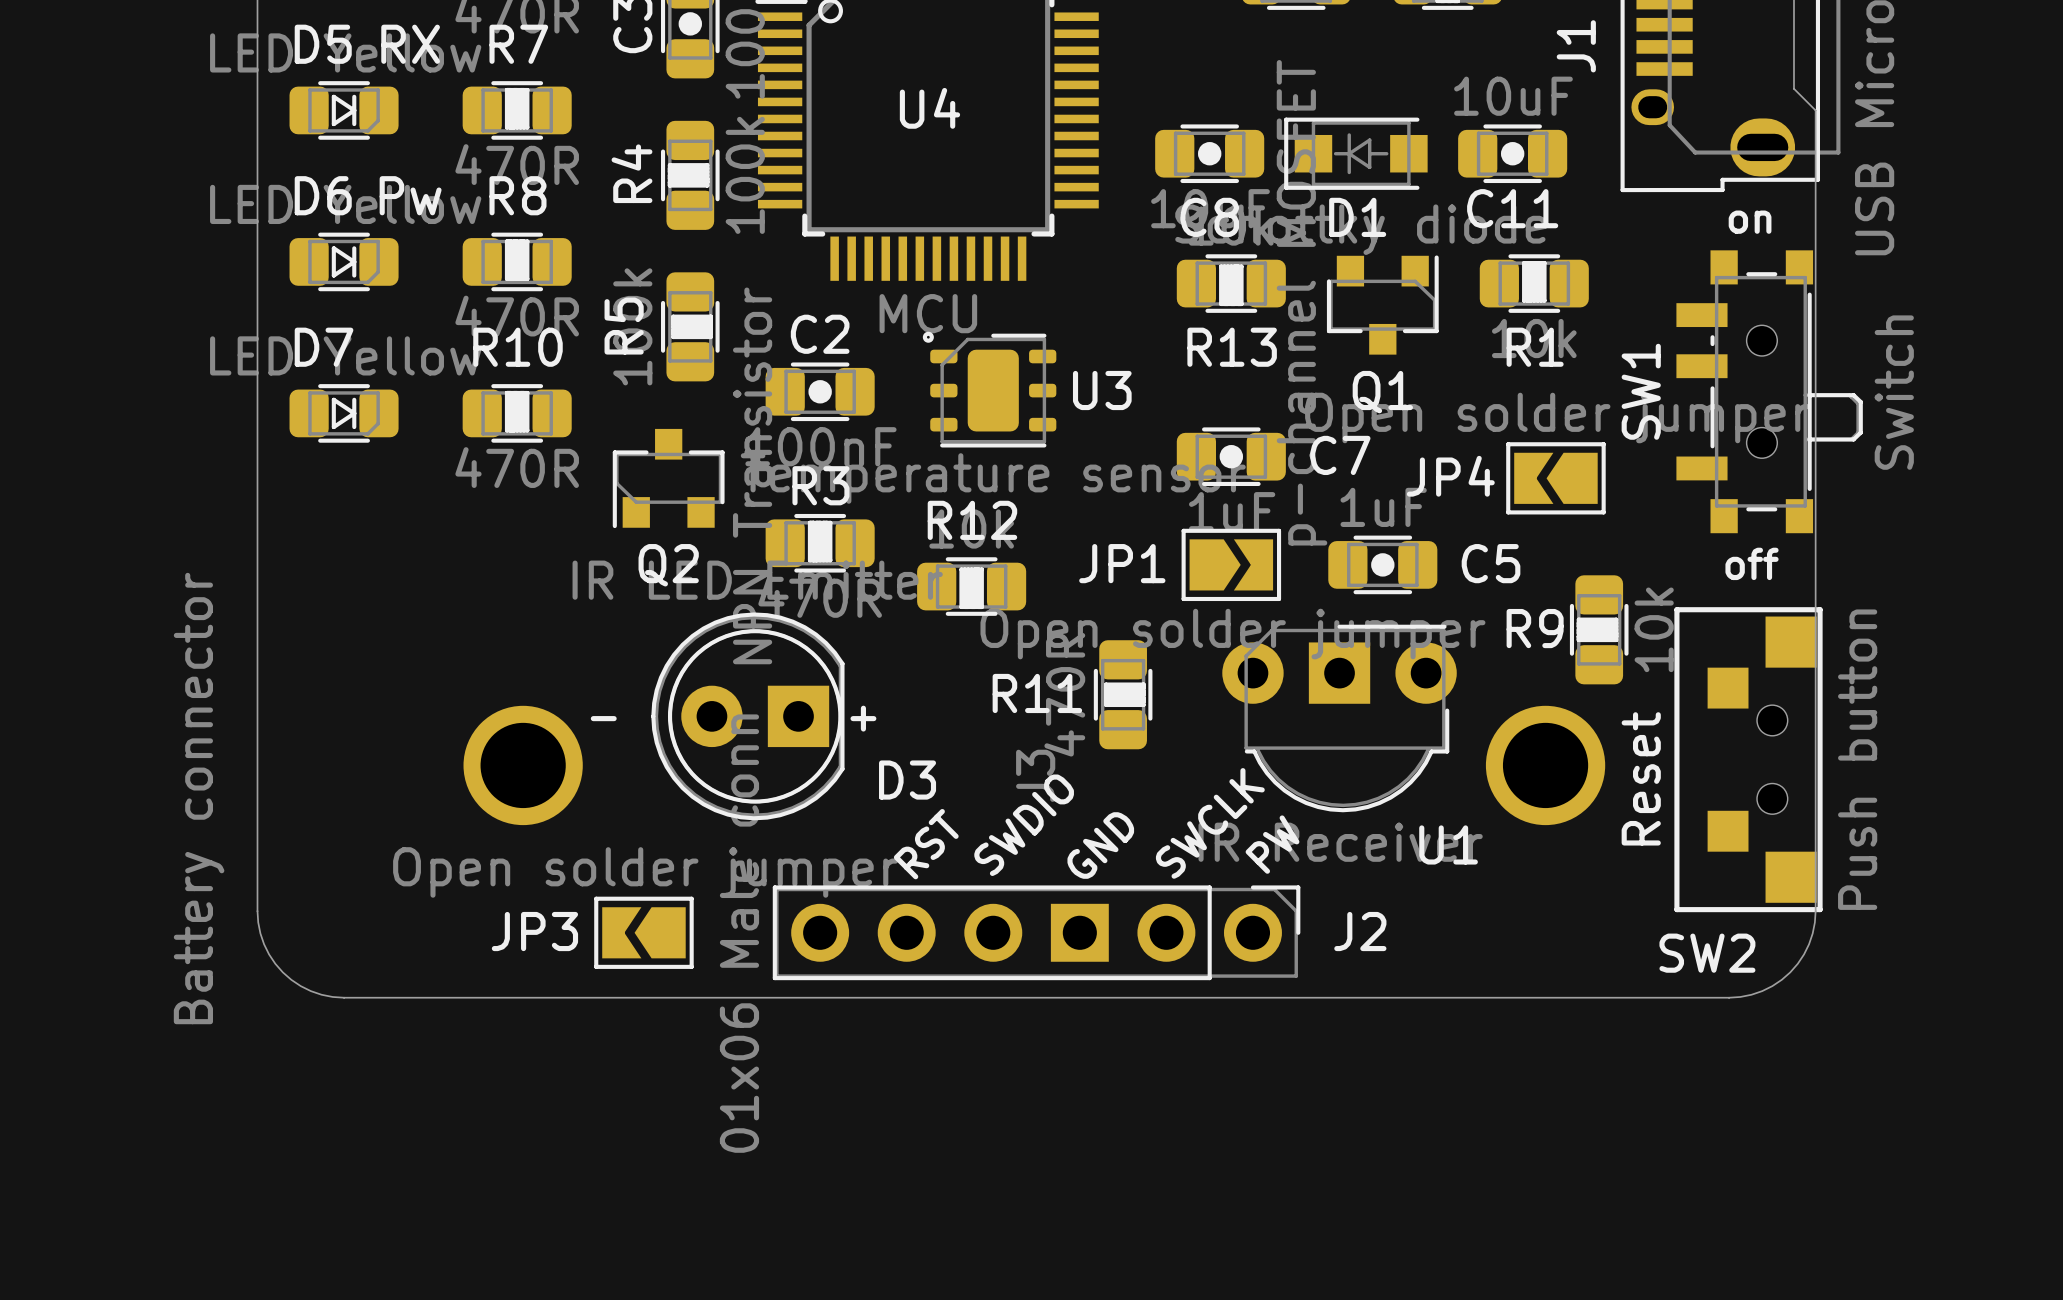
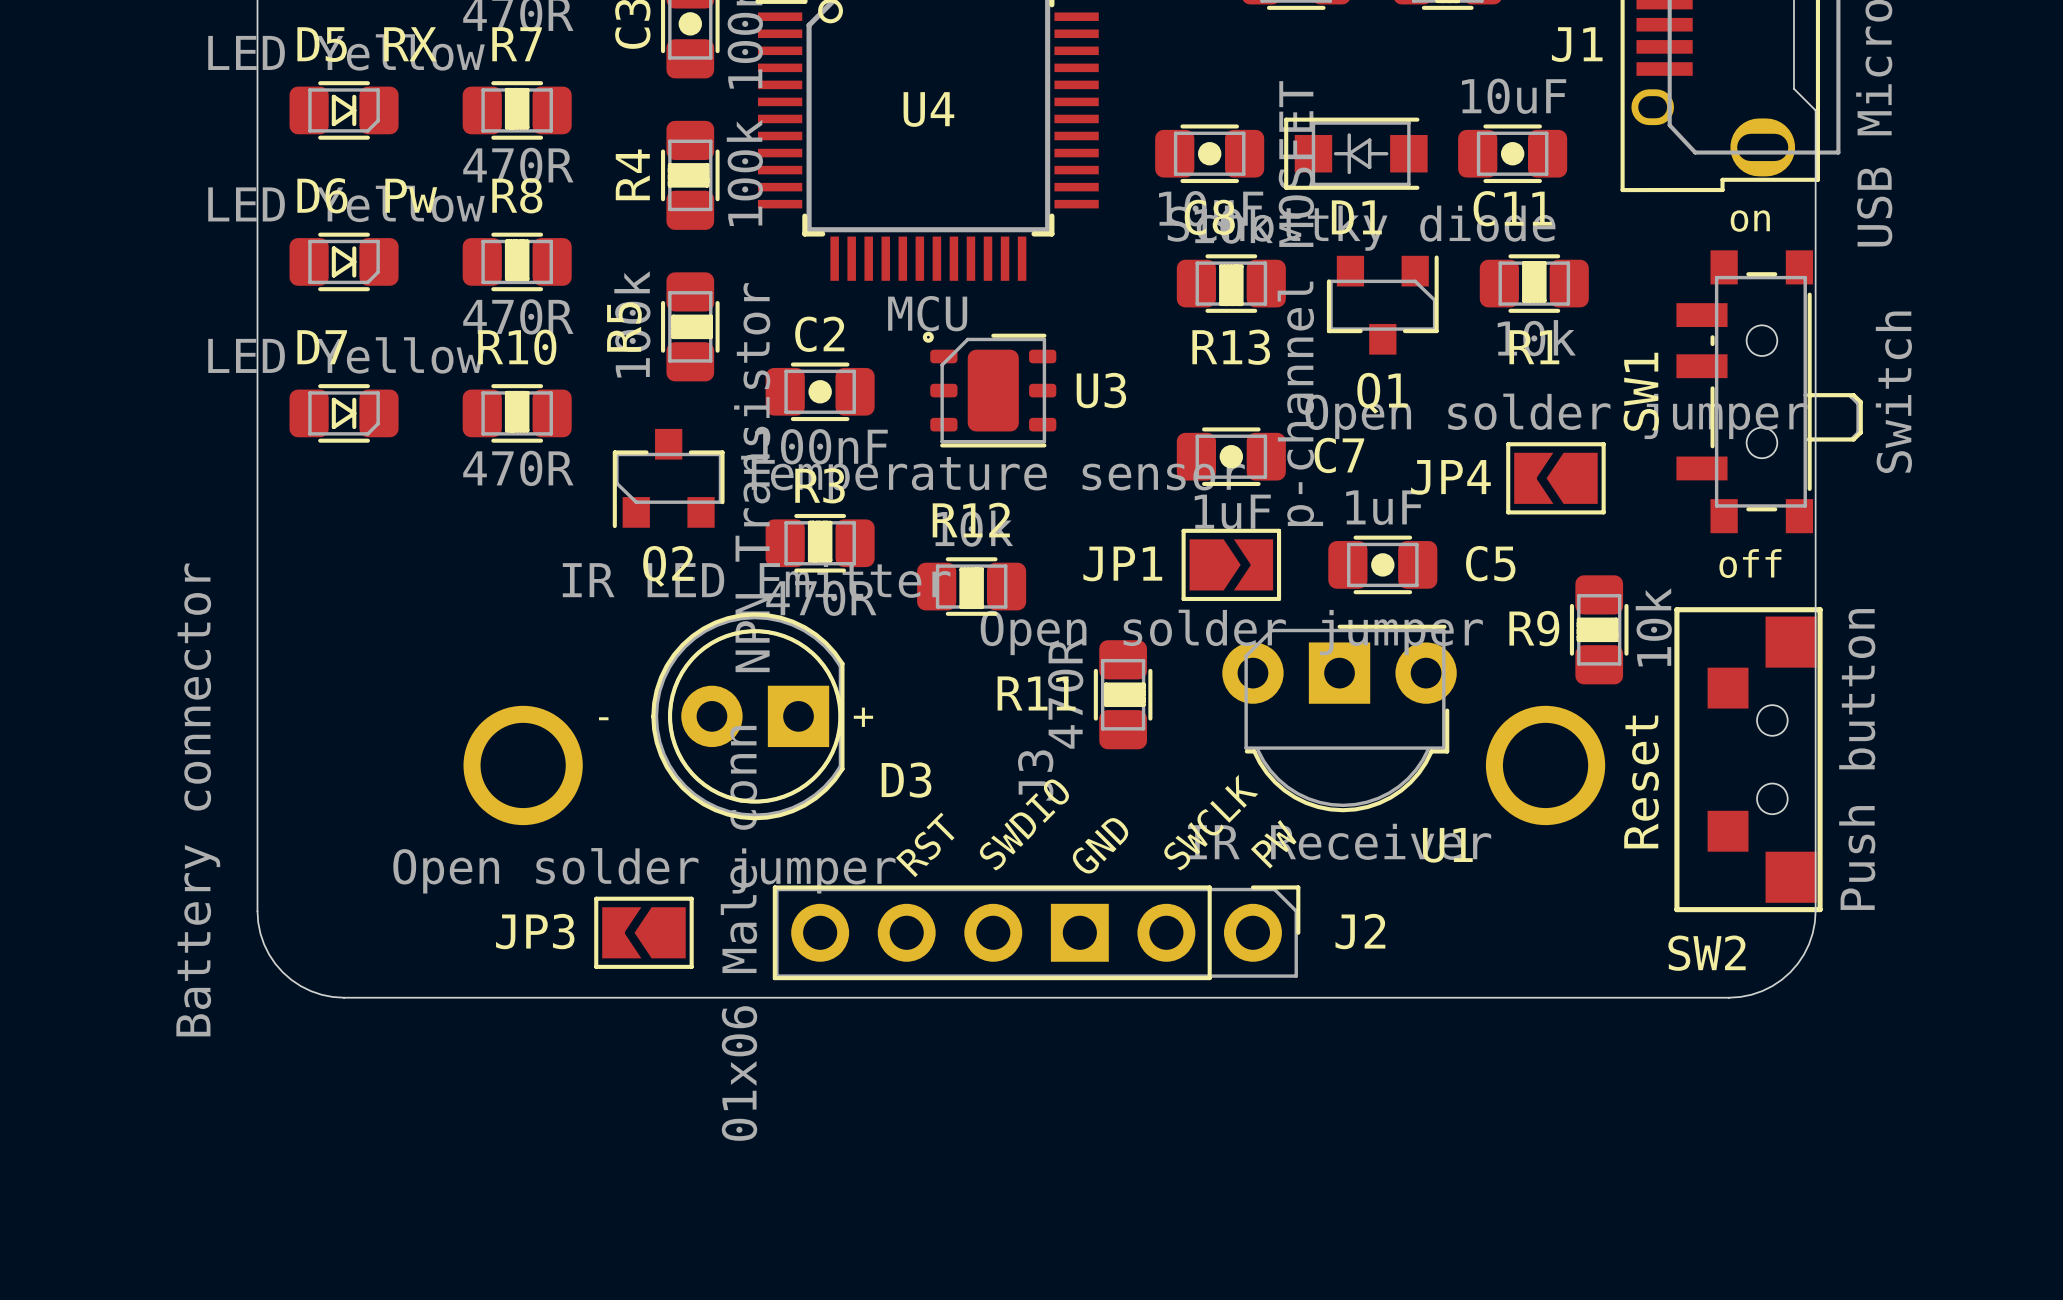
J1 name rotation: 0° (1576, 46) -> 90° clockwise (1577, 44)

